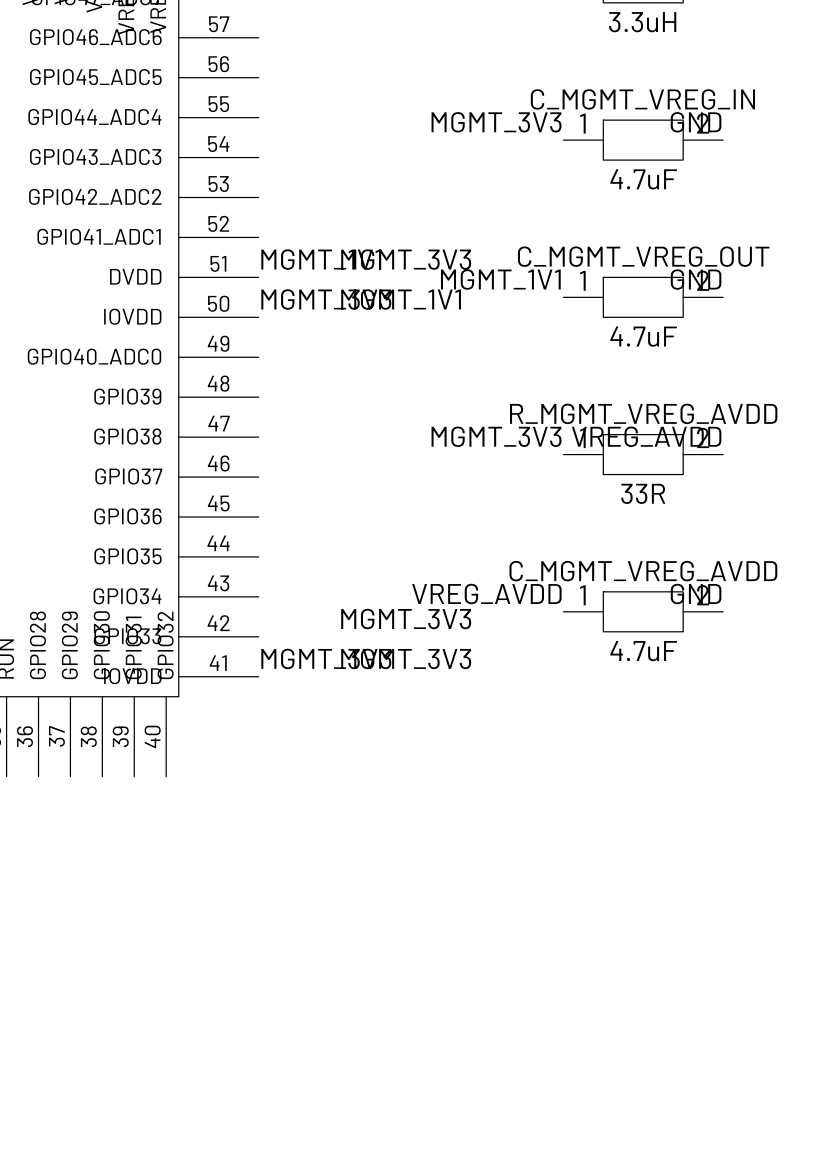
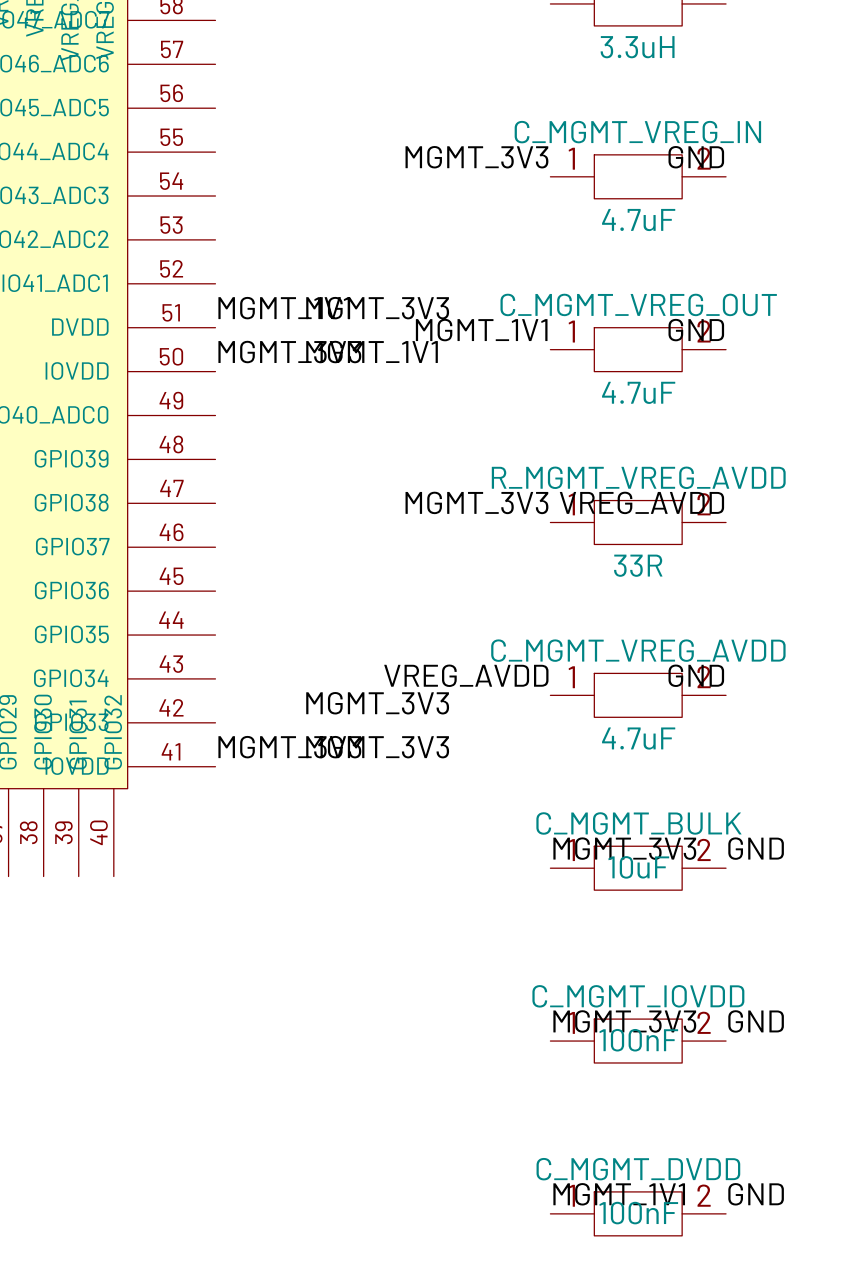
label: none -> MGMT_3V3 (624, 848)
label: none -> GND (756, 848)
C_MGMT_BULK: none -> 10uF (638, 868)
label: none -> MGMT_3V3 (624, 1021)
label: none -> GND (756, 1021)
C_MGMT_IOVDD: none -> 100nF (638, 1041)
label: none -> MGMT_1V1 (619, 1194)
label: none -> GND (756, 1194)
C_MGMT_DVDD: none -> 100nF (638, 1213)

